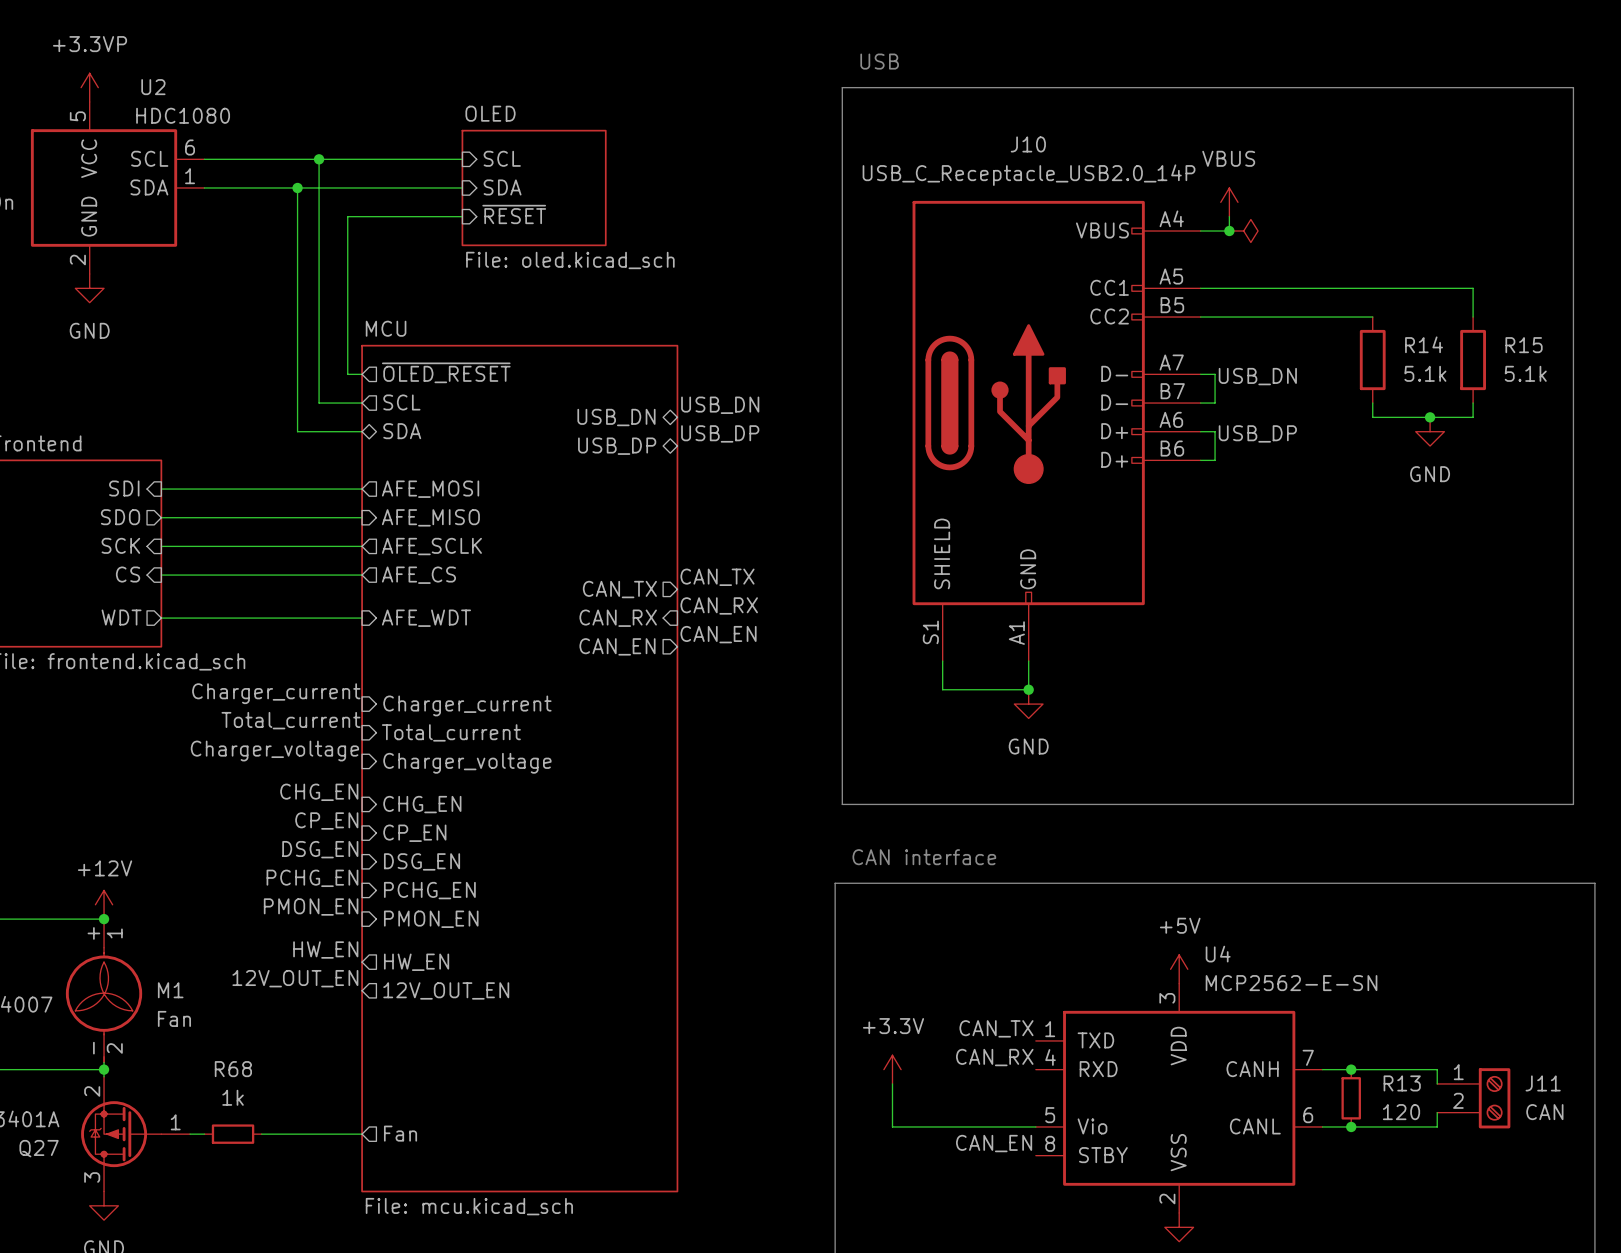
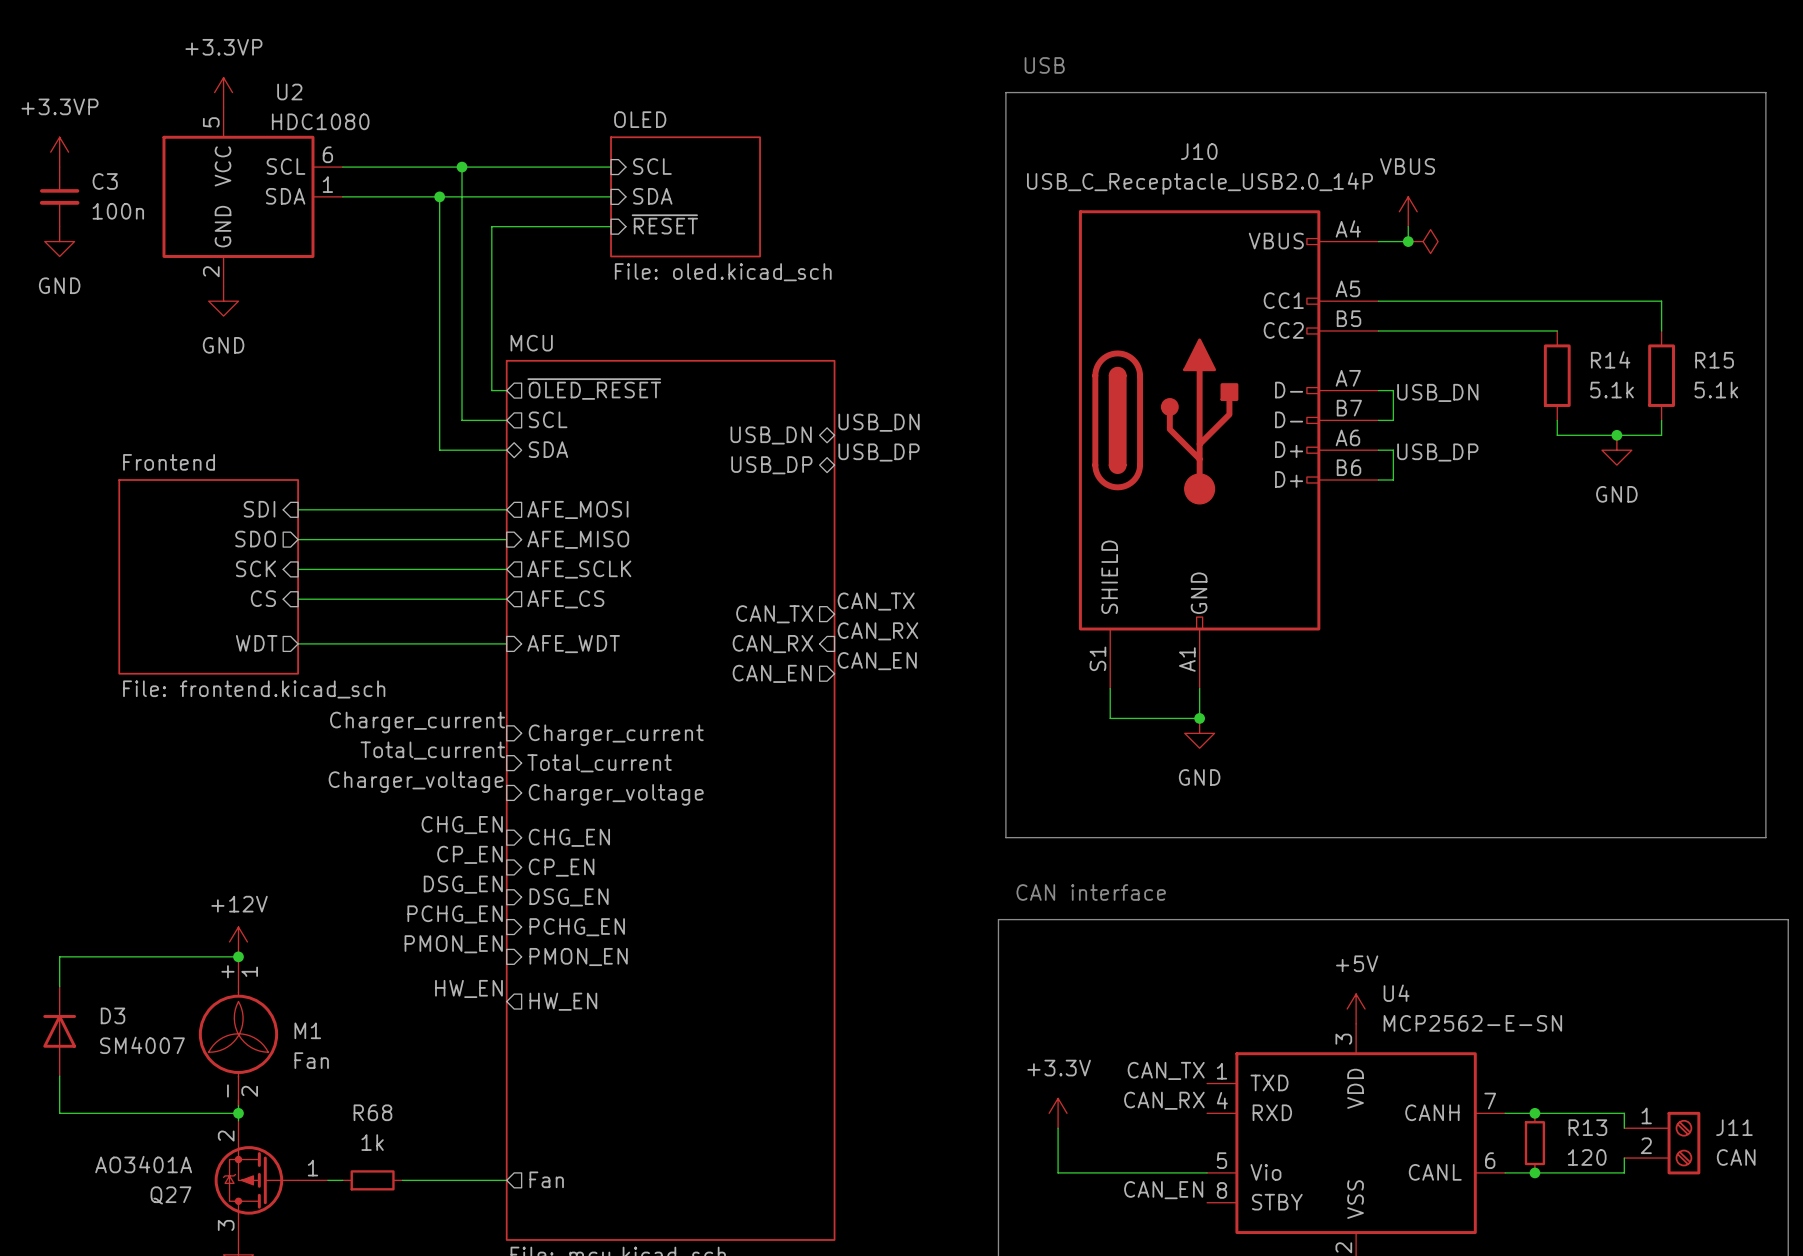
label: 12V_OUT_EN (295, 978) -> none
sheet pin: 12V_OUT_EN (446, 990) -> none

